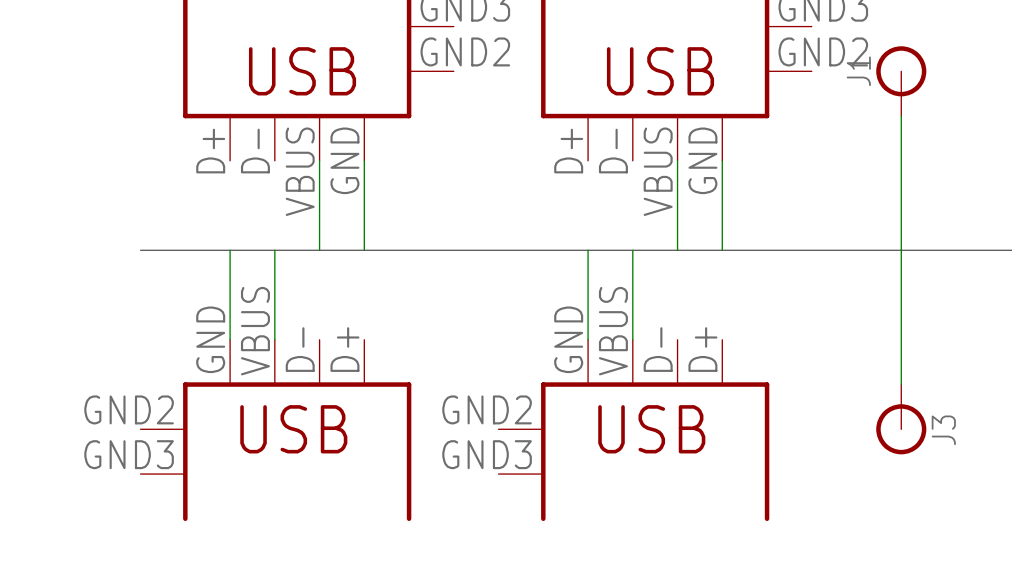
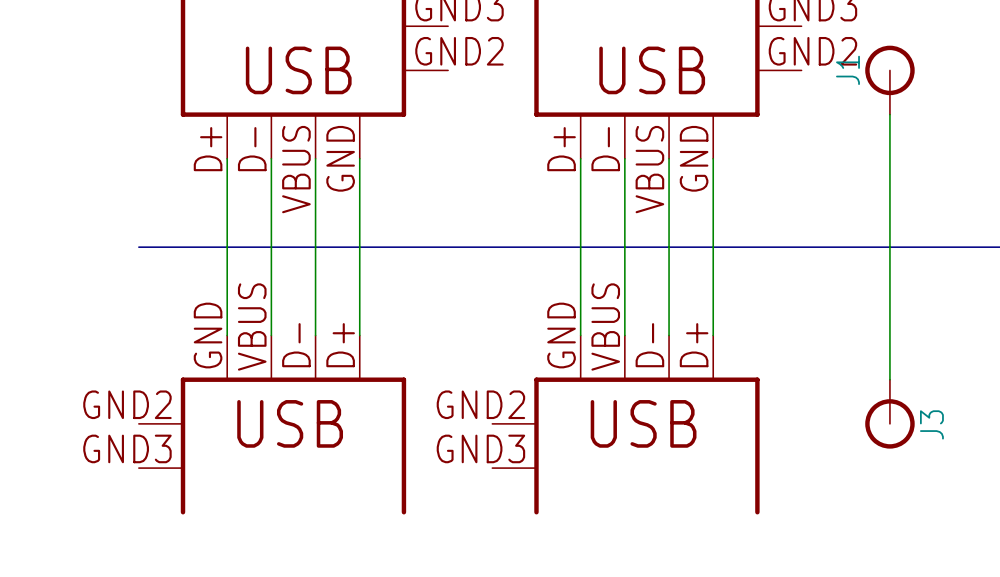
wire: none -> (227, 158) (227, 247)
wire: none -> (271, 158) (271, 247)
wire: none -> (580, 158) (580, 247)
wire: none -> (624, 158) (624, 247)
wire: none -> (315, 247) (315, 335)
wire: none -> (359, 247) (359, 335)
wire: none -> (669, 247) (669, 335)
wire: none -> (713, 247) (713, 335)

